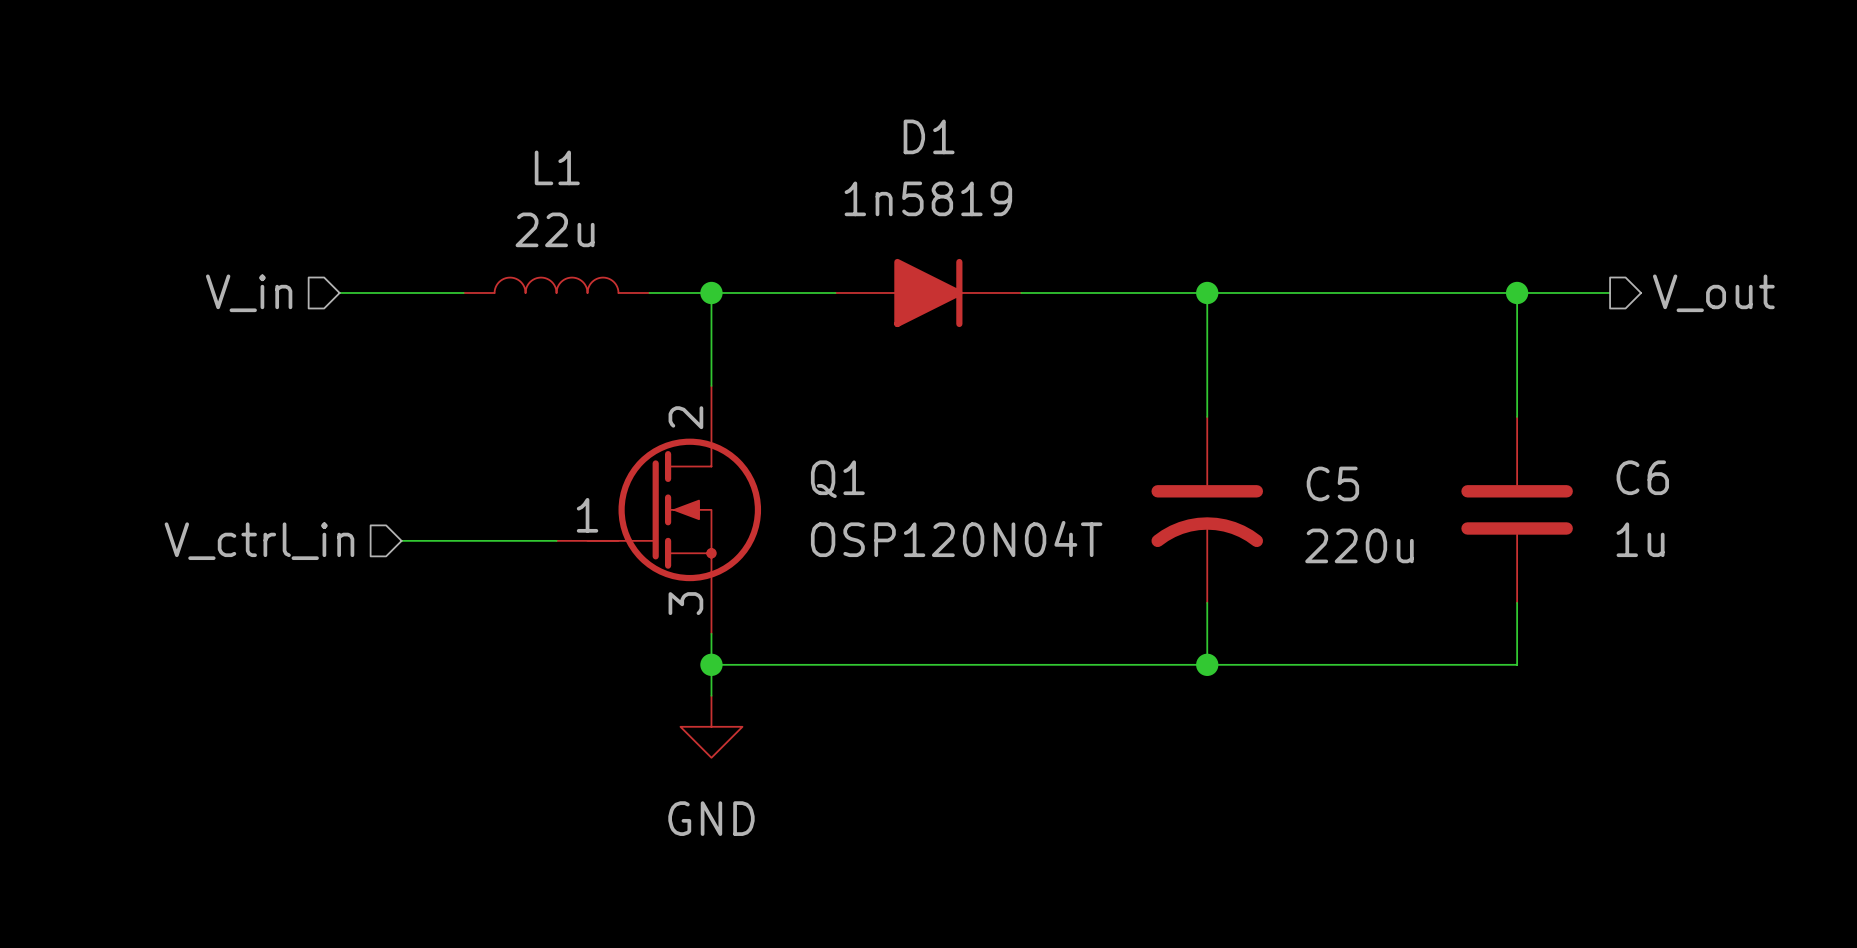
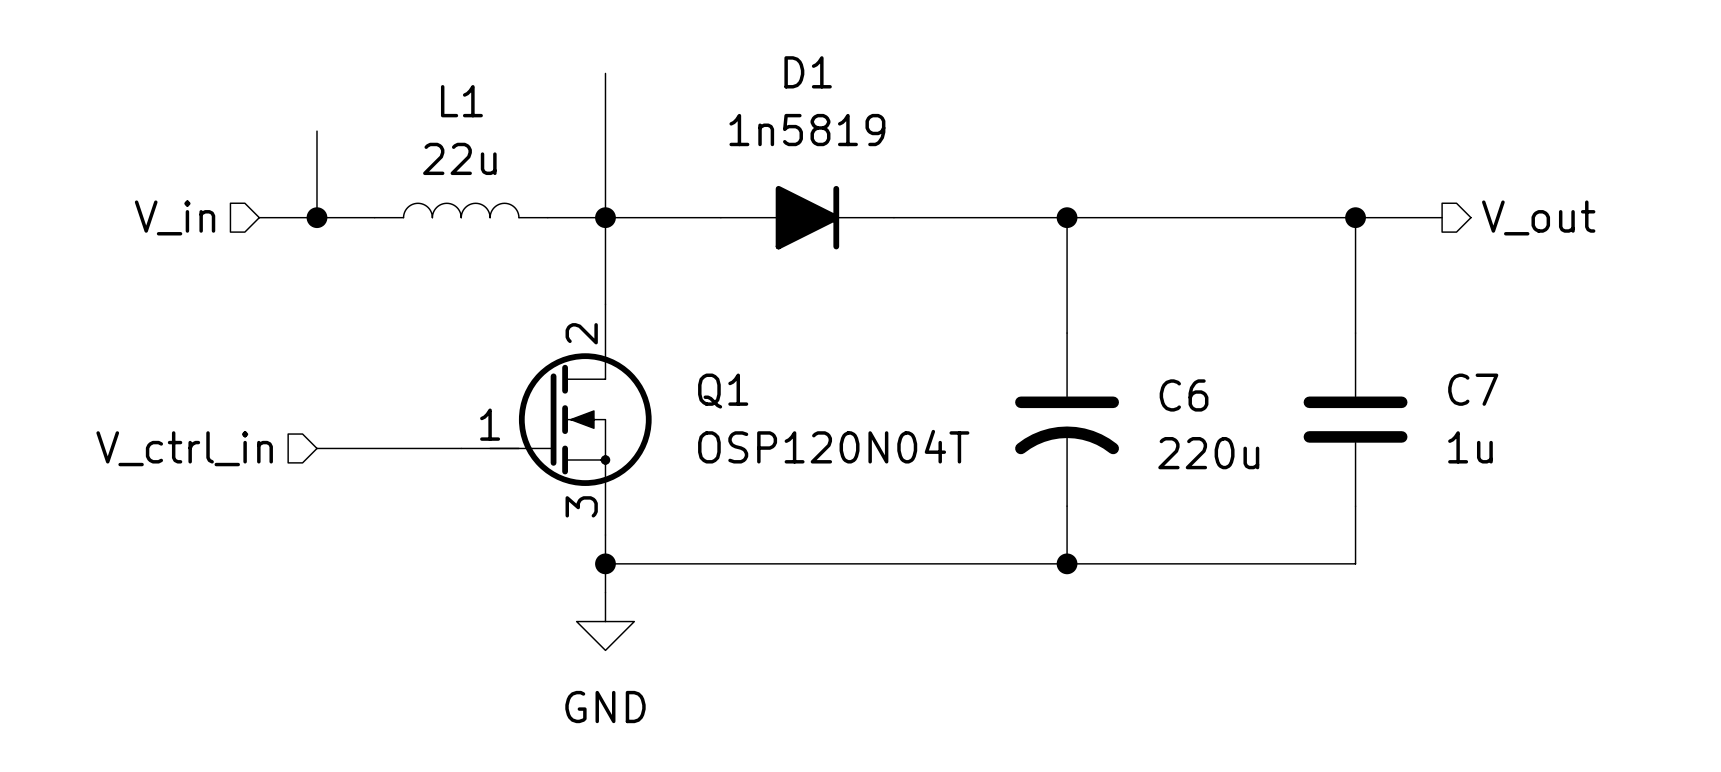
wire: none -> (605, 73) (605, 217)
wire: none -> (316, 131) (316, 217)
junction: none -> (316, 217)
C6 name: C6 (1642, 477) -> C7 (1473, 389)
C5 name: C5 (1332, 483) -> C6 (1184, 395)

